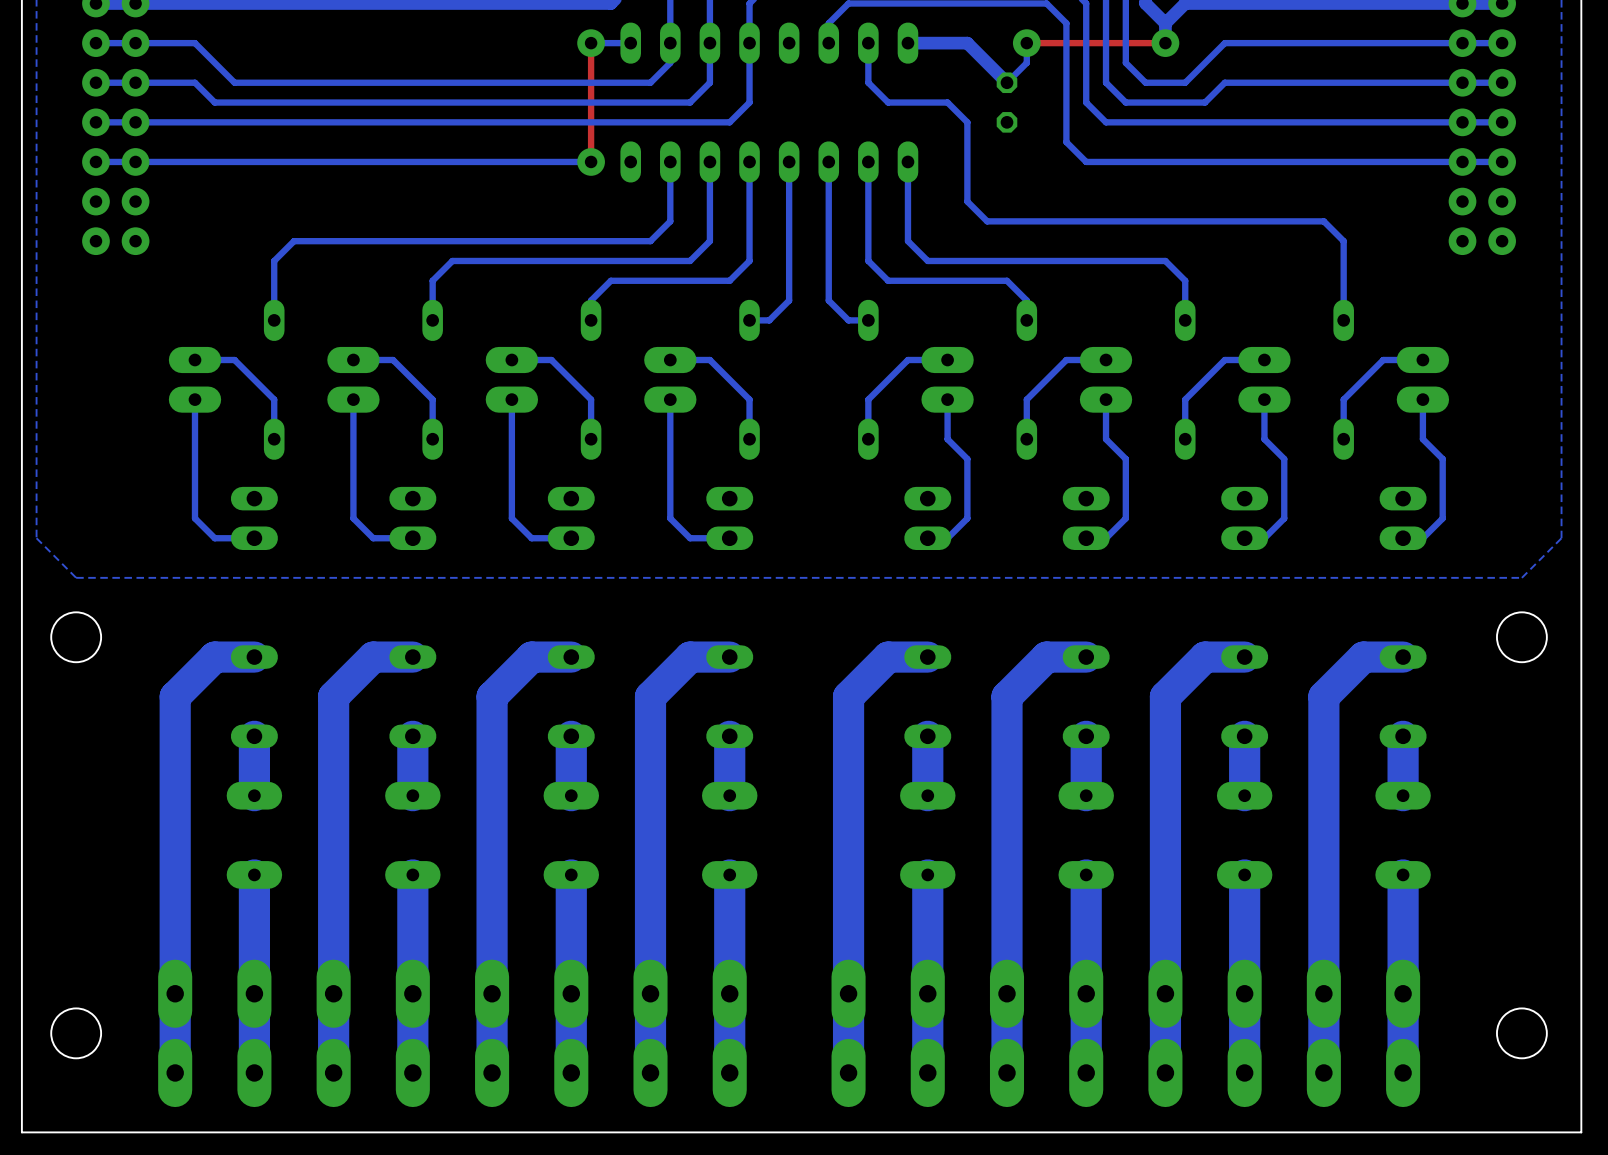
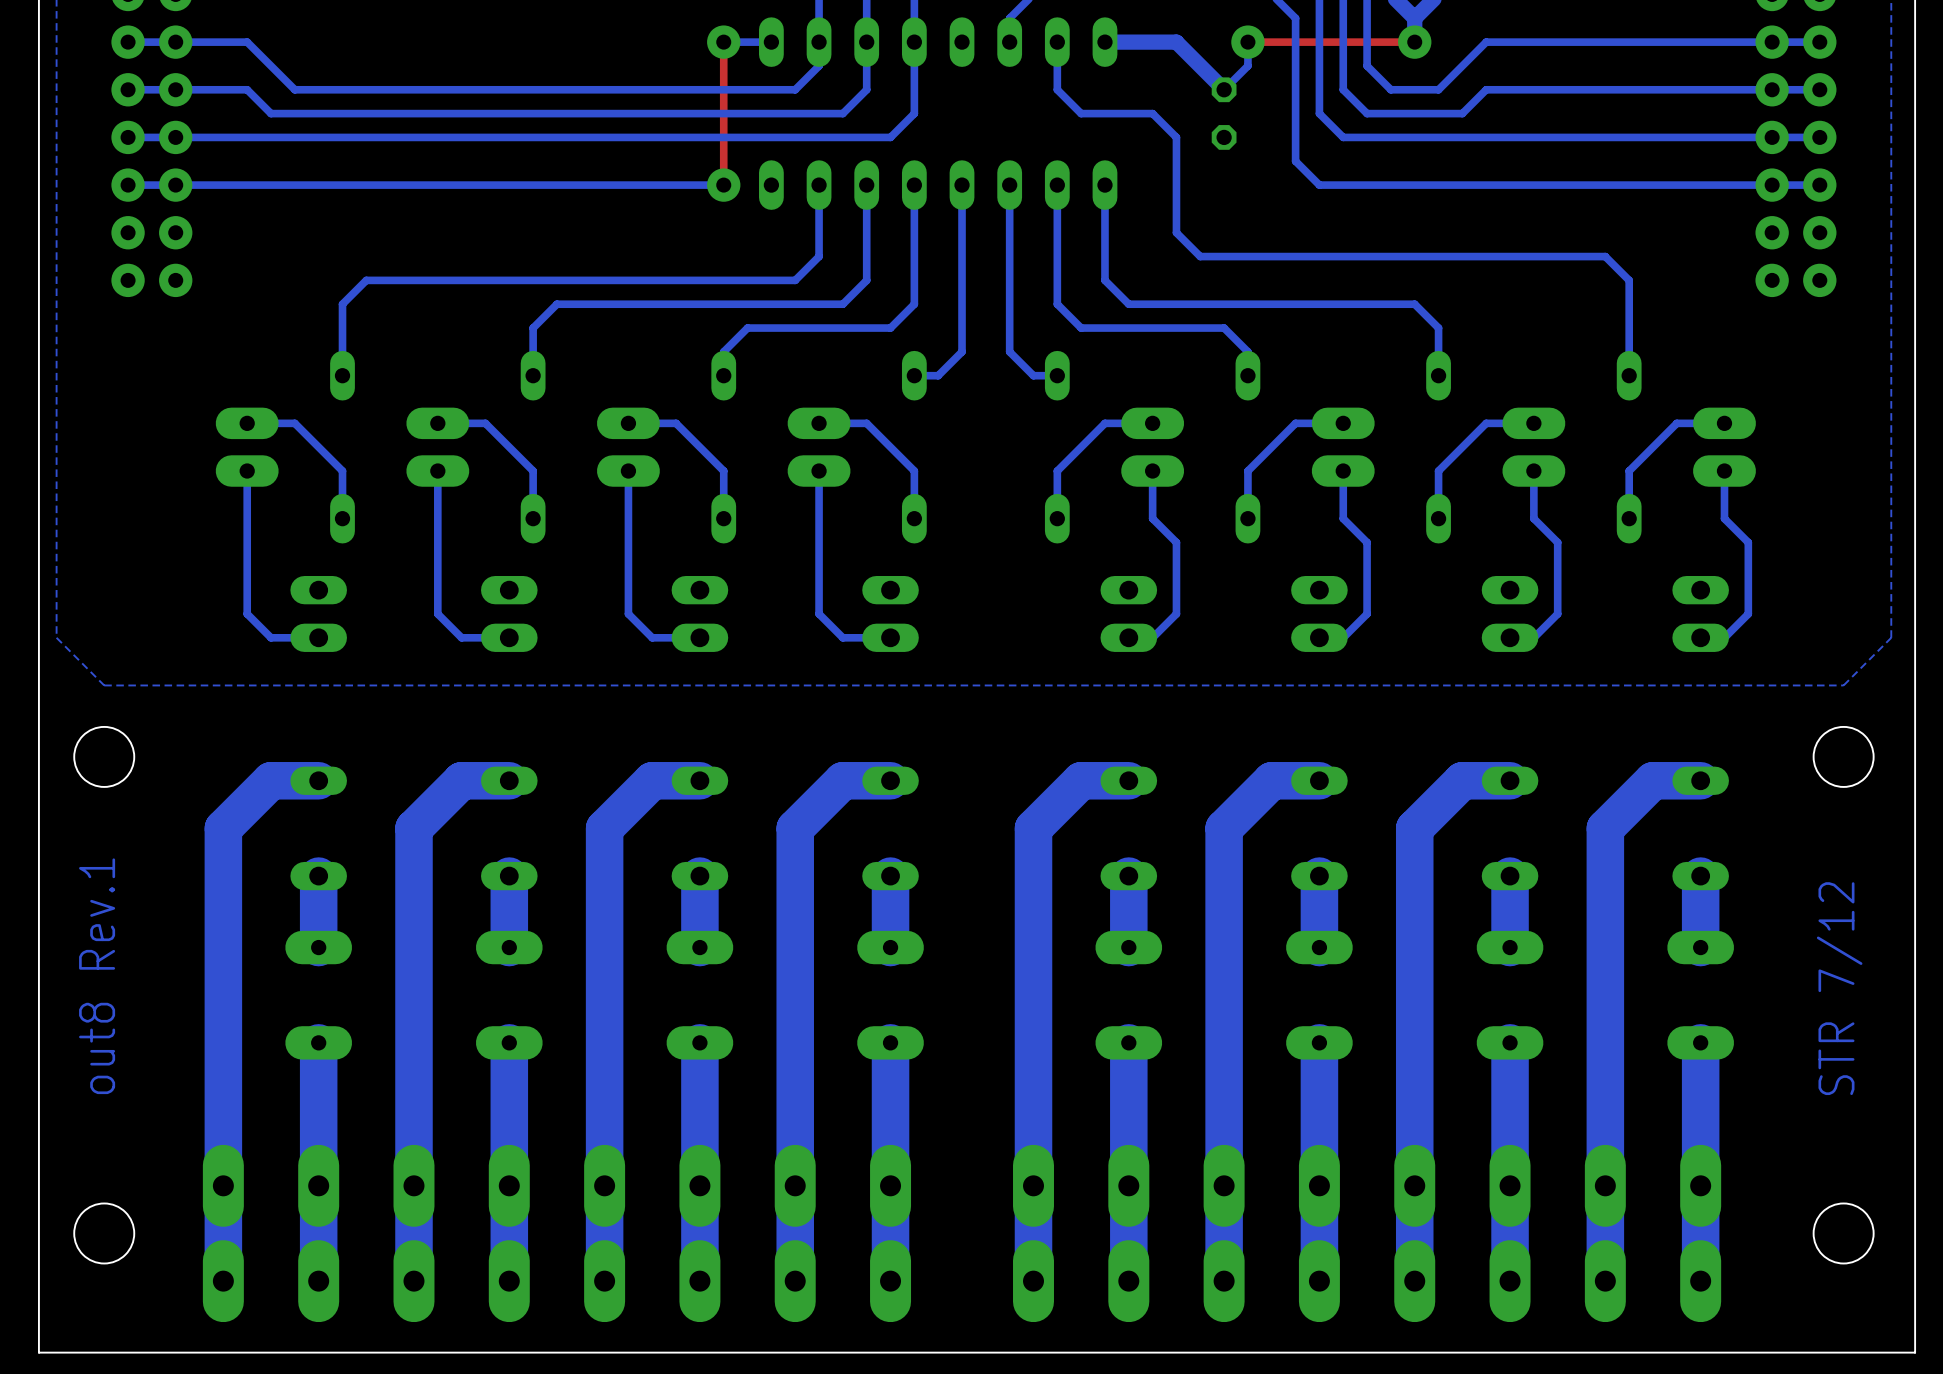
text: none -> out8 Rev.1 (97, 976)
text: none -> STR 7/12 (1839, 988)

